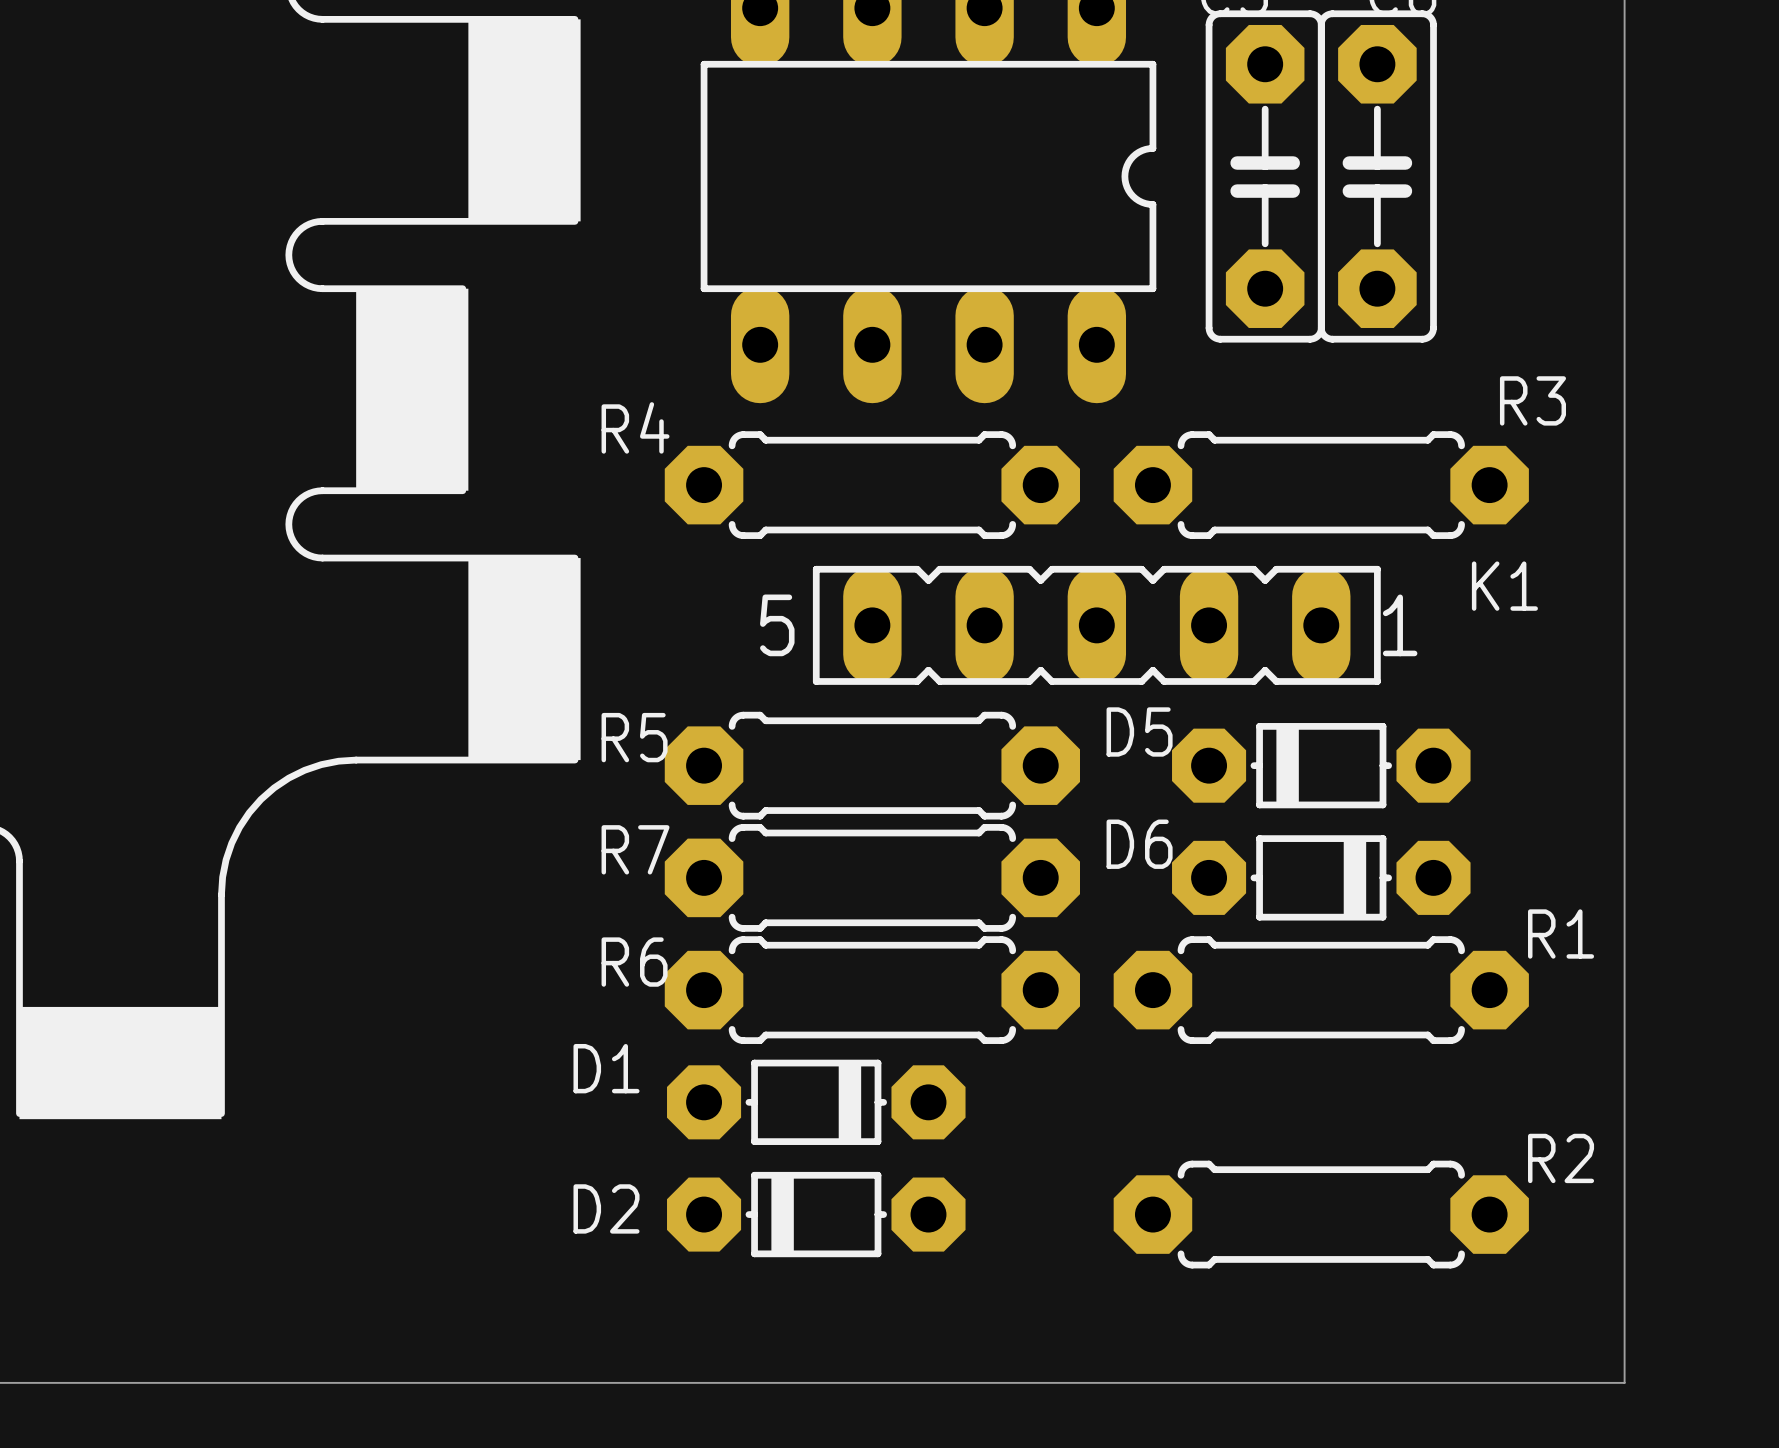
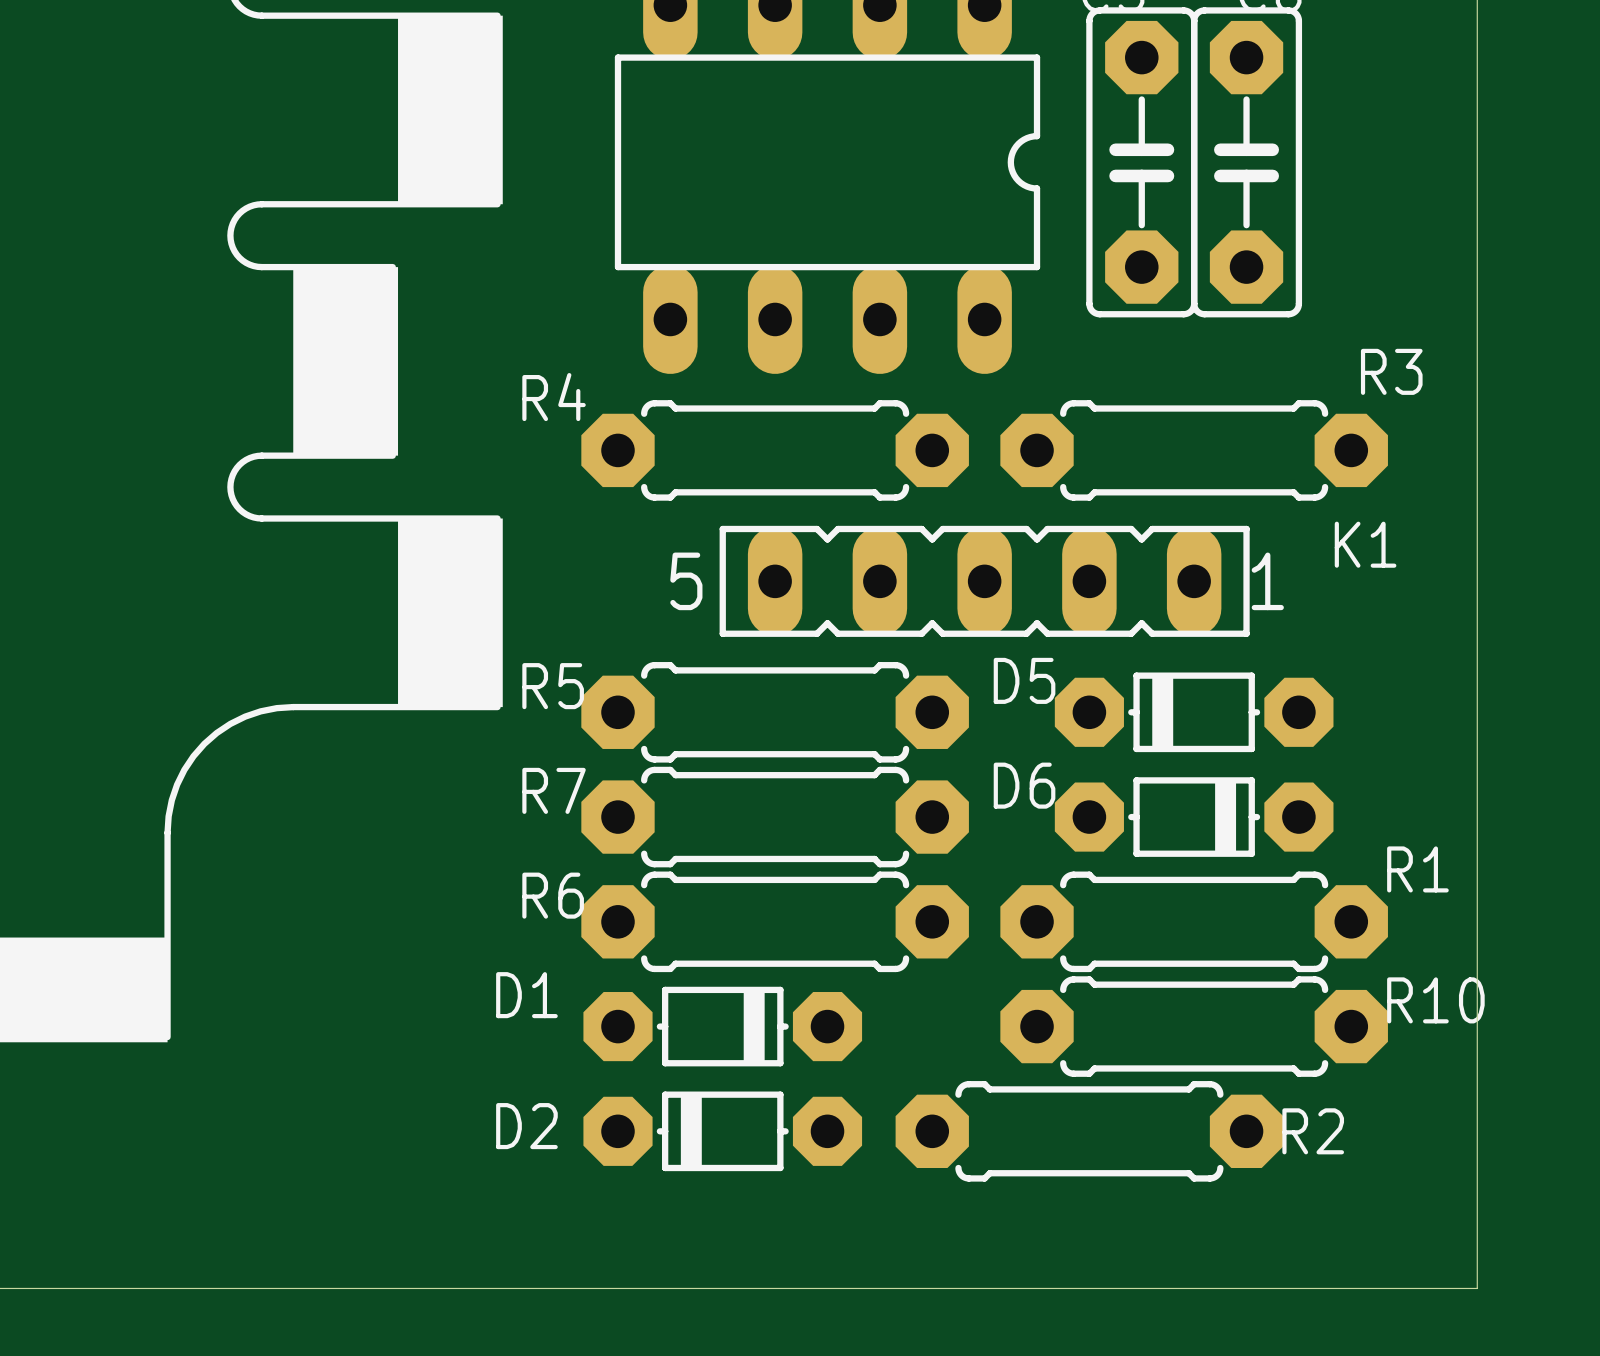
R10: none -> (1194, 1026)
R2 name position: R2 (1561, 1158) -> R2 (1313, 1131)
R2 position: (1321, 1214) -> (1089, 1131)

